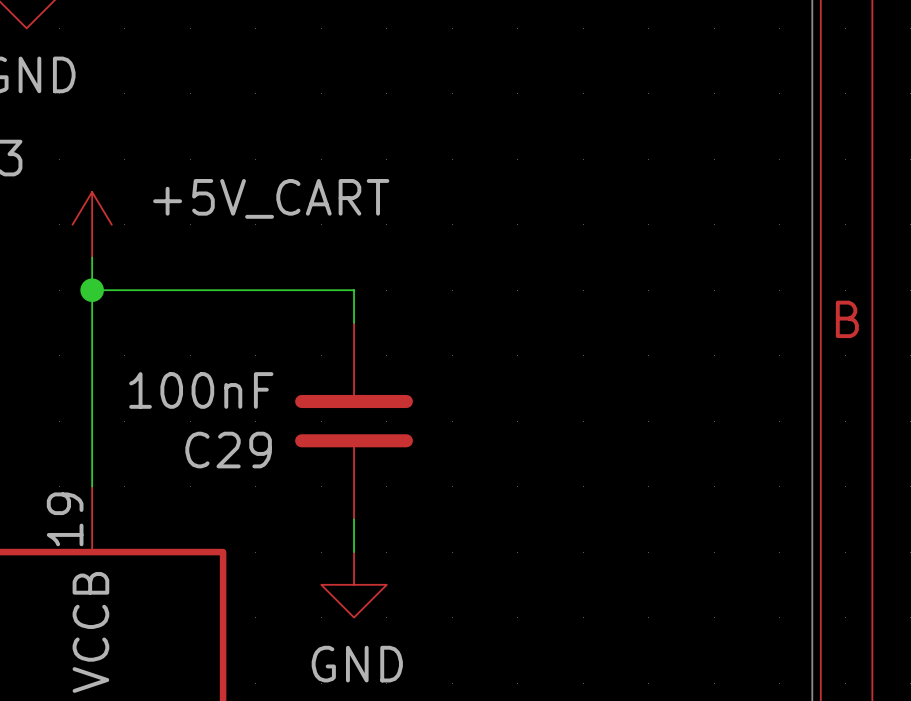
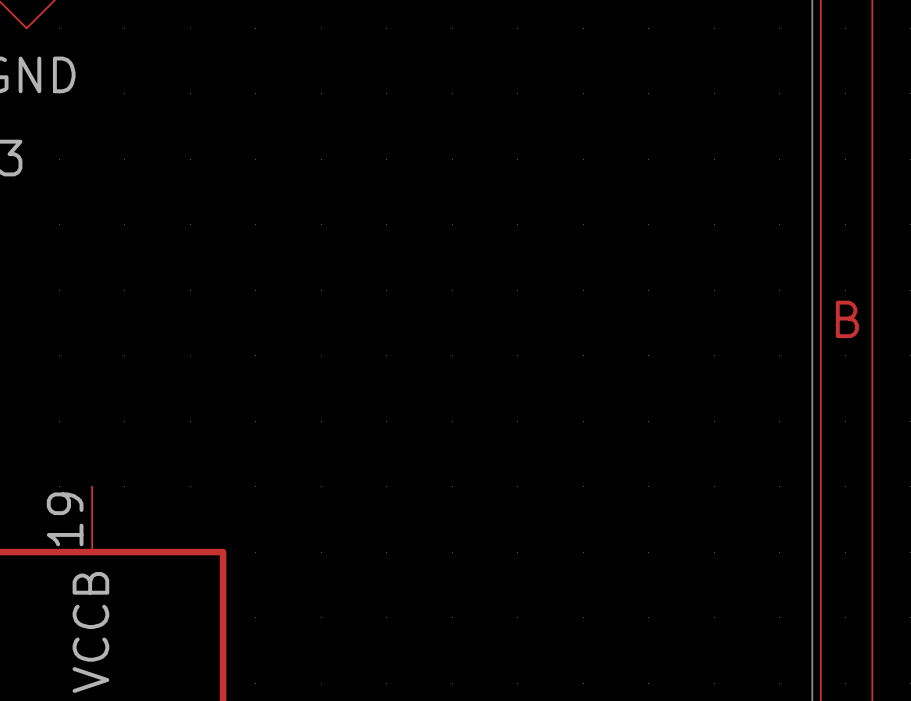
power symbol: +5V_CART (92, 224) -> none
wire: (92, 257) (92, 486) -> none
wire: (92, 290) (354, 290) (354, 322) -> none
junction: (92, 290) -> none
C29: 100nF (354, 421) -> none
wire: (354, 519) (354, 552) -> none
power symbol: GND (354, 584) -> none

